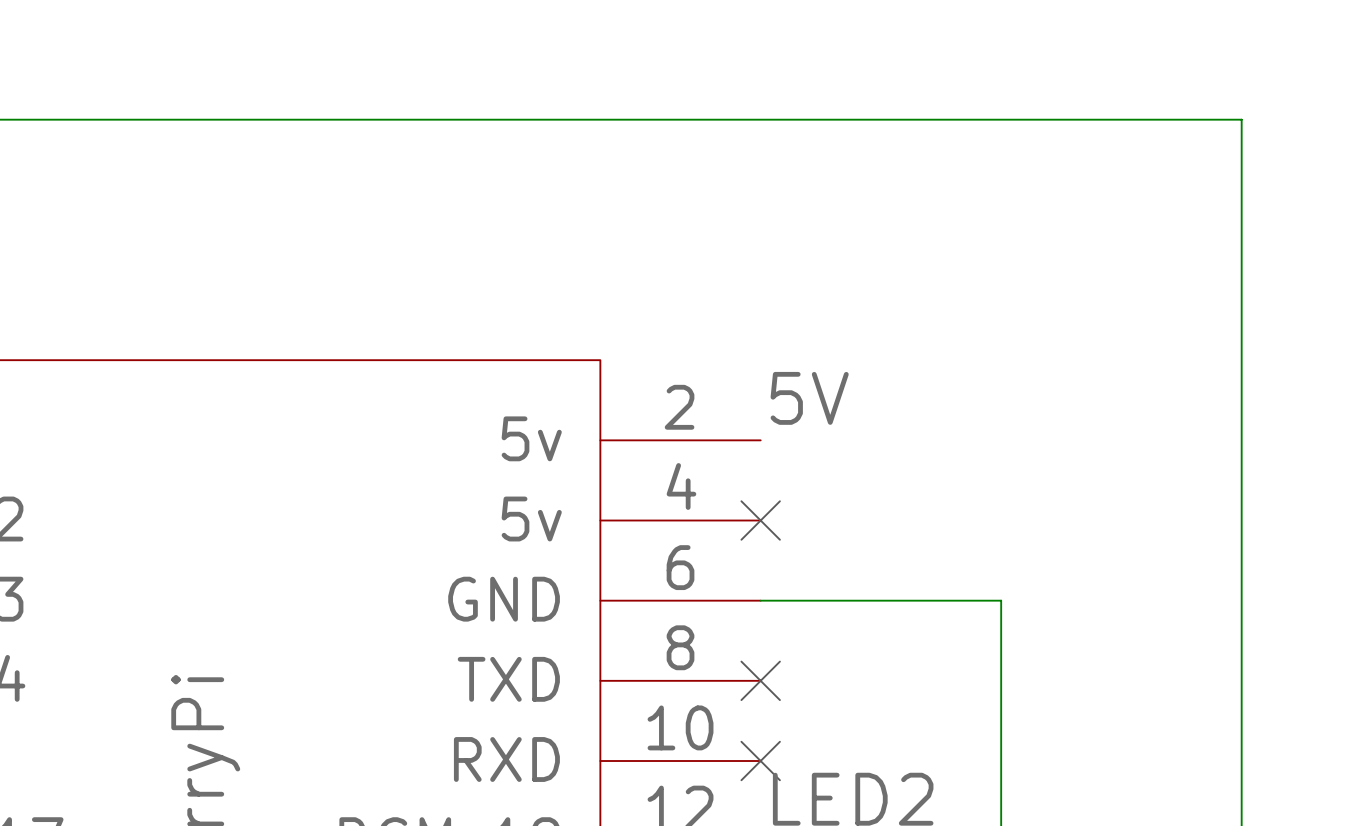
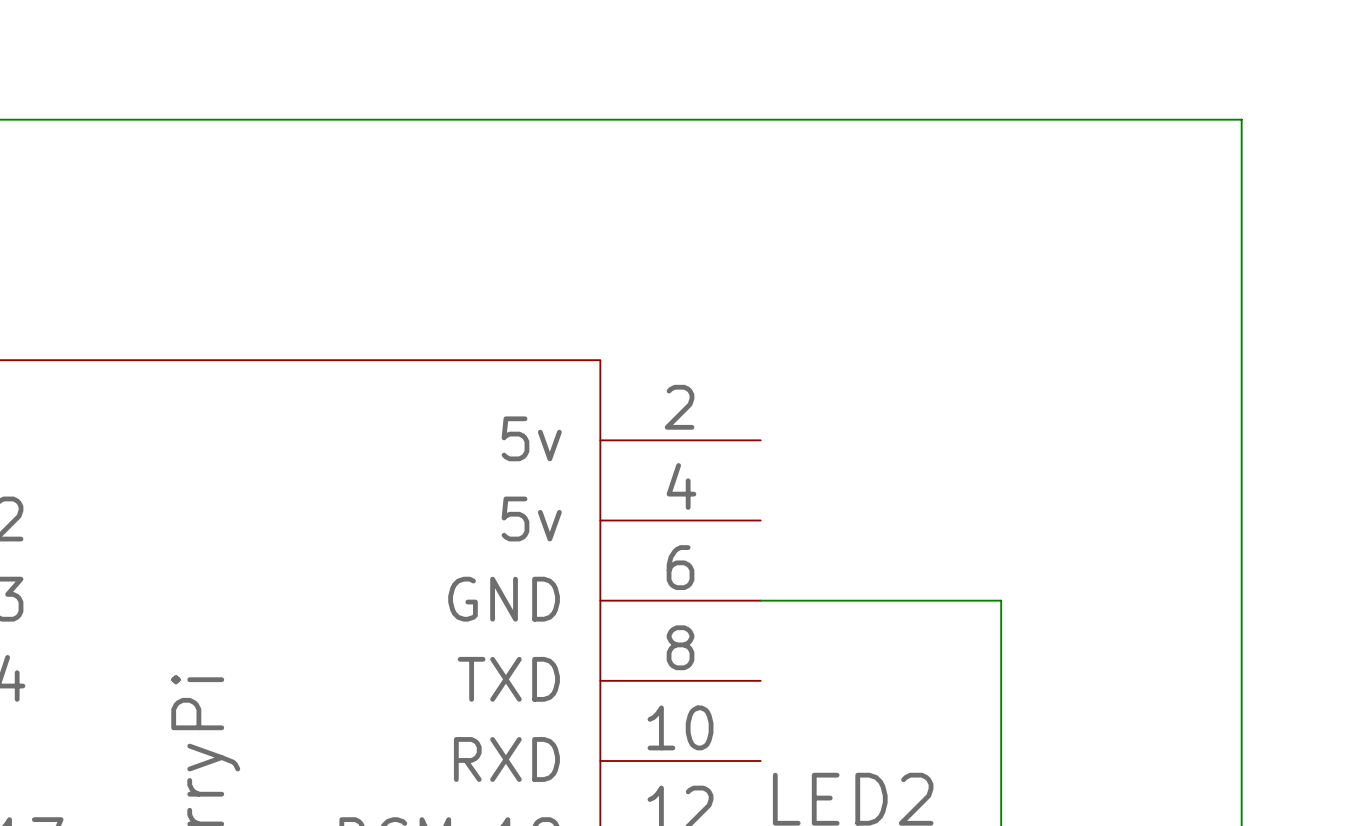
label: 5V (809, 398) -> none
no-connect mark: (760, 520) -> none
no-connect mark: (760, 680) -> none
no-connect mark: (760, 761) -> none

